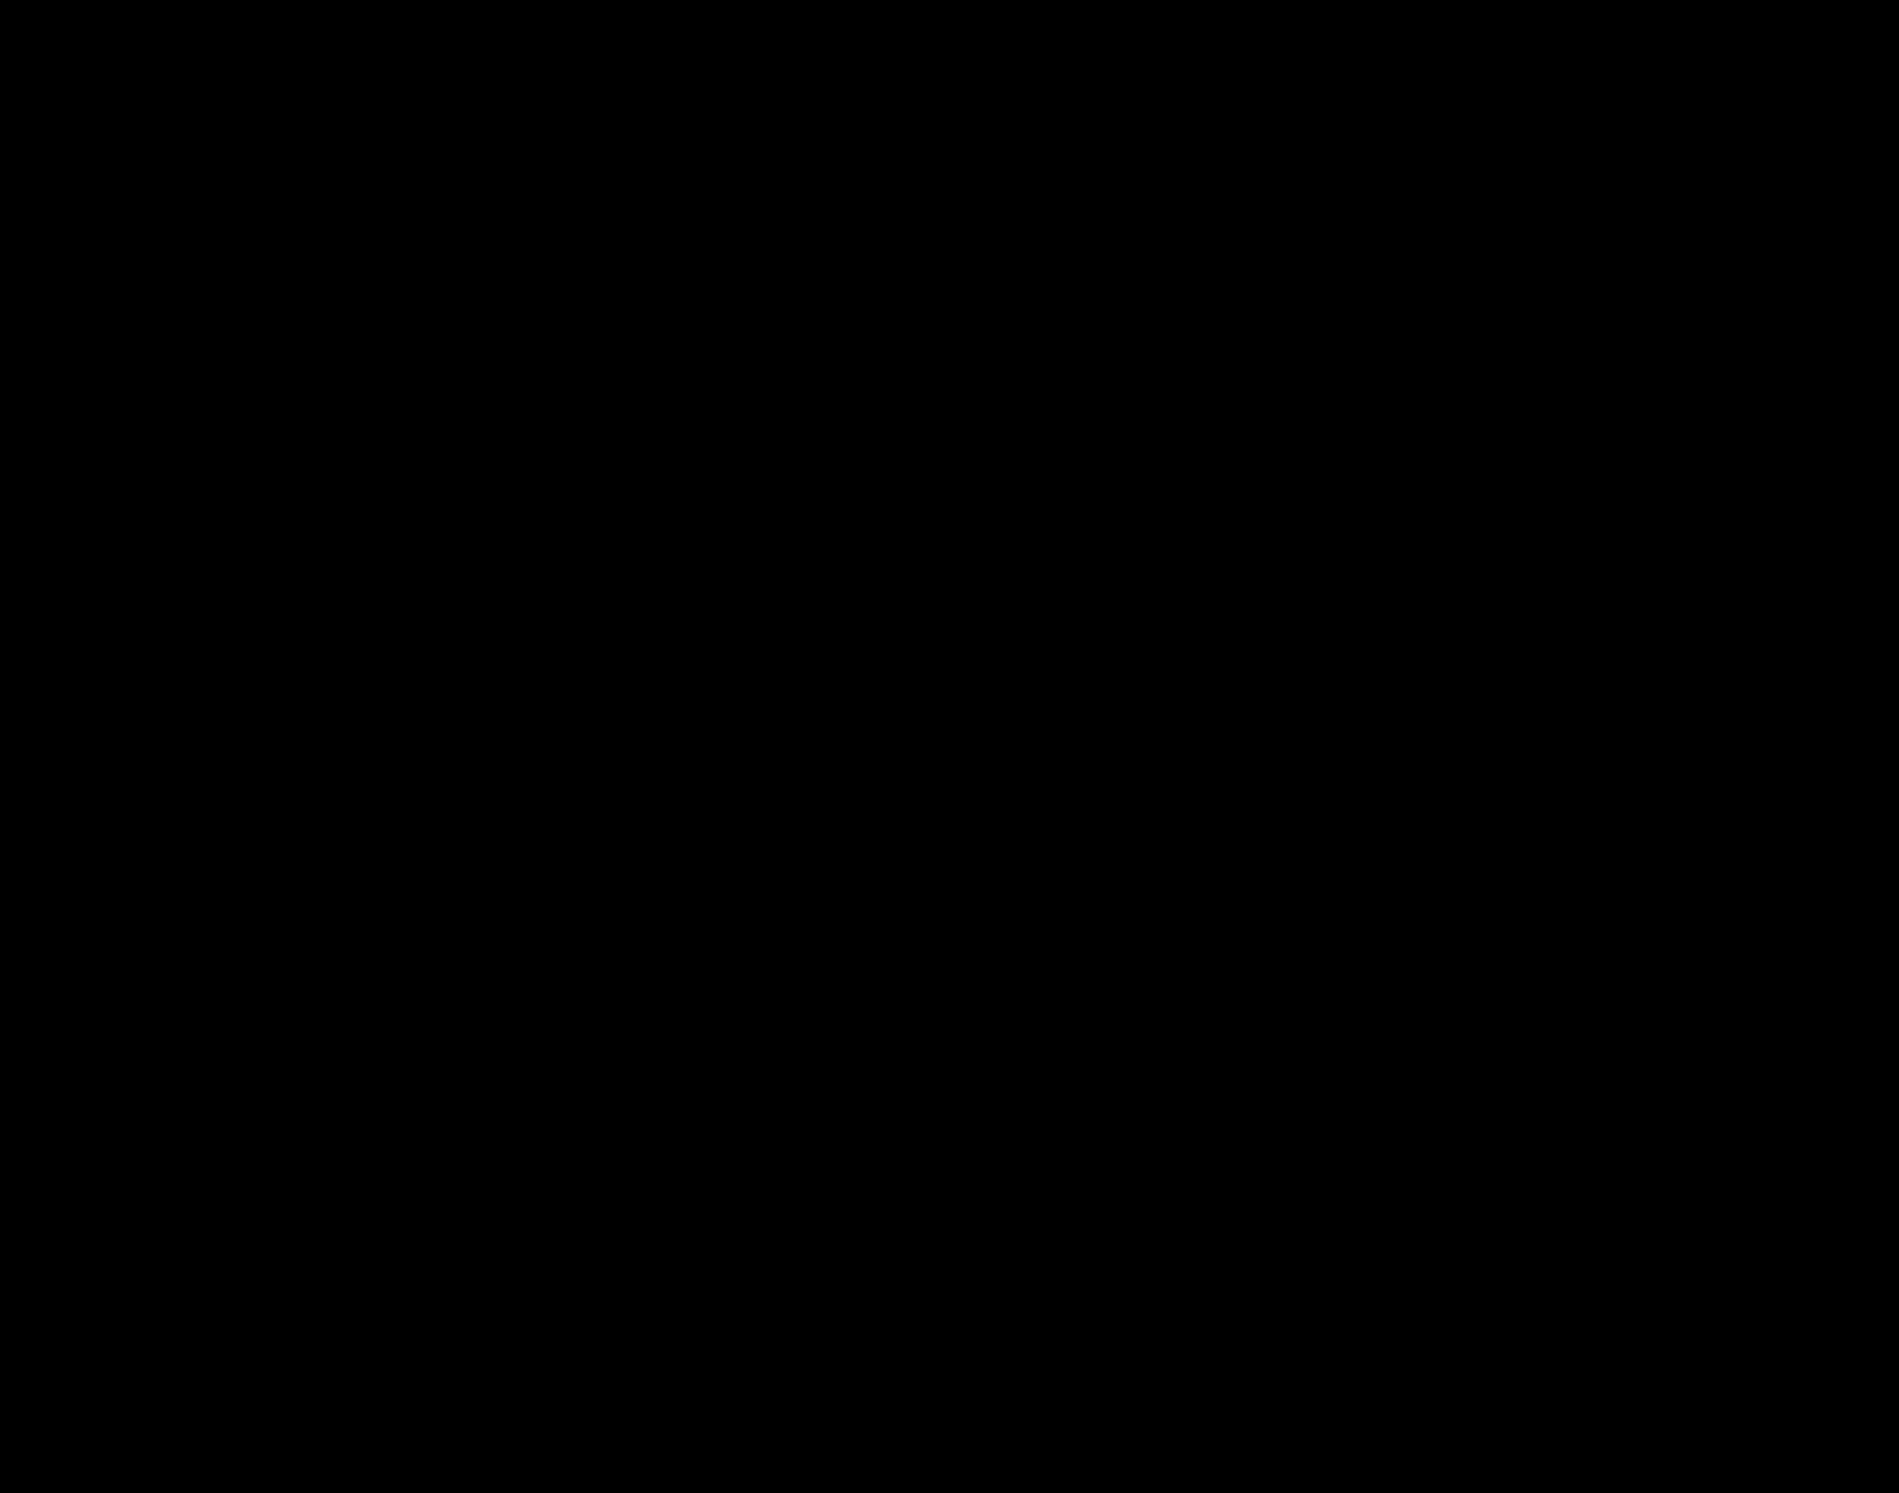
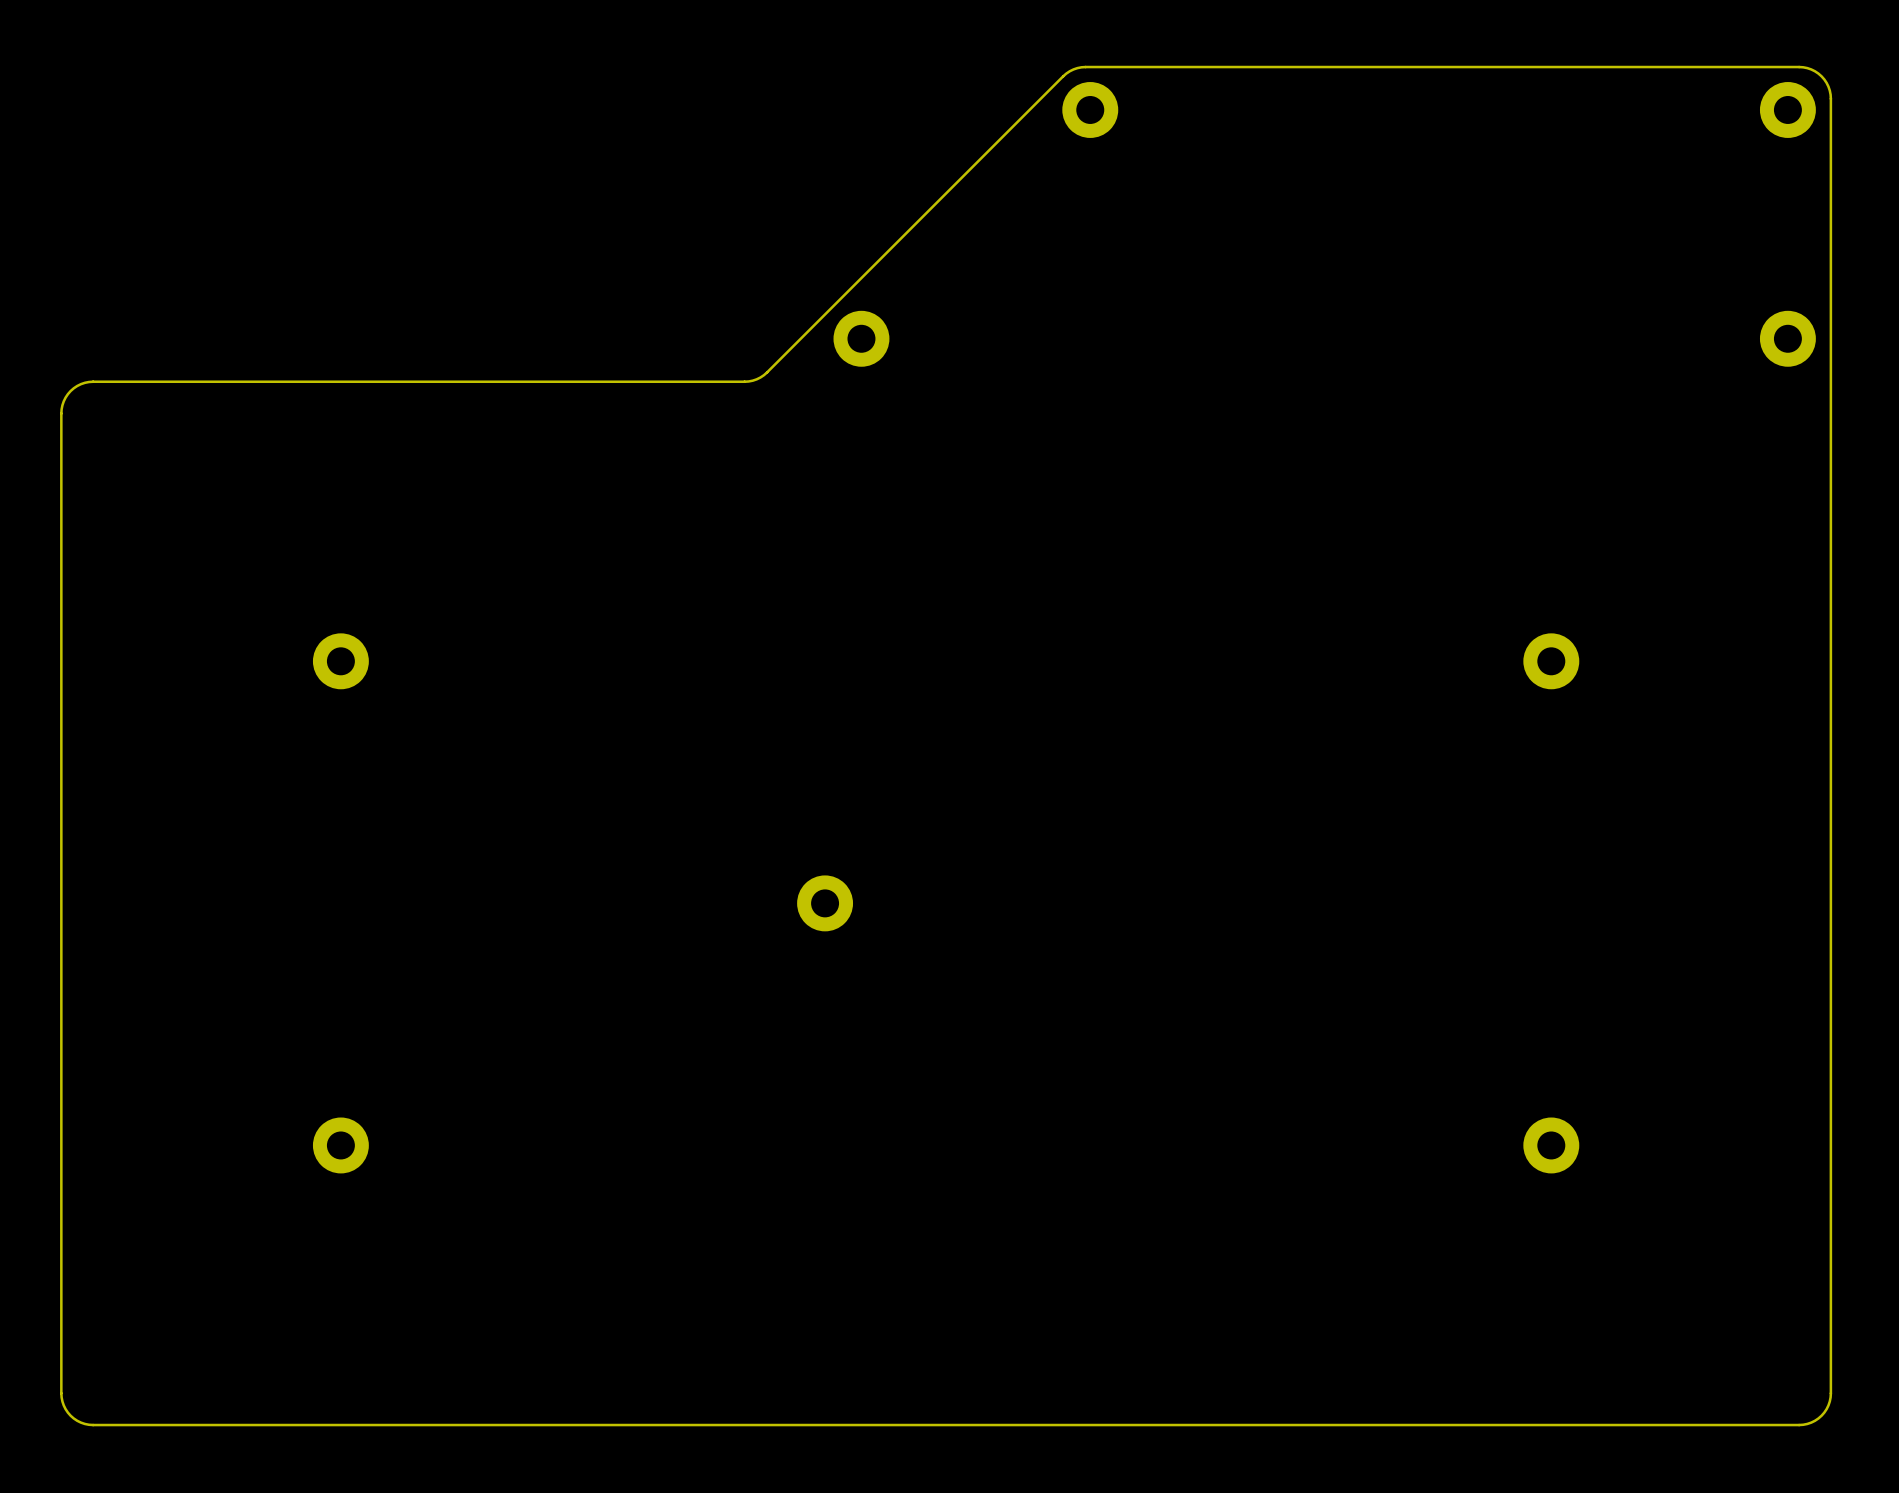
board edge: none -> (1085, 67) (1799, 67) (1814, 71) (1826, 82) (1830, 98) (1830, 1393) (1829, 1401) (1824, 1412) (1814, 1420) (1799, 1425) (93, 1425) (80, 1422) (73, 1418) (65, 1409) (61, 1393) (61, 413) (62, 405) (67, 394) (80, 384) (93, 381) (752, 380) (767, 372) (1063, 76) (1073, 69) (1085, 67)
part: none -> (1090, 109)
part: none -> (1787, 109)
part: none -> (861, 338)
part: none -> (1787, 338)
part: none -> (340, 661)
part: none -> (1551, 661)
part: none -> (825, 903)
part: none -> (340, 1145)
part: none -> (1551, 1145)

